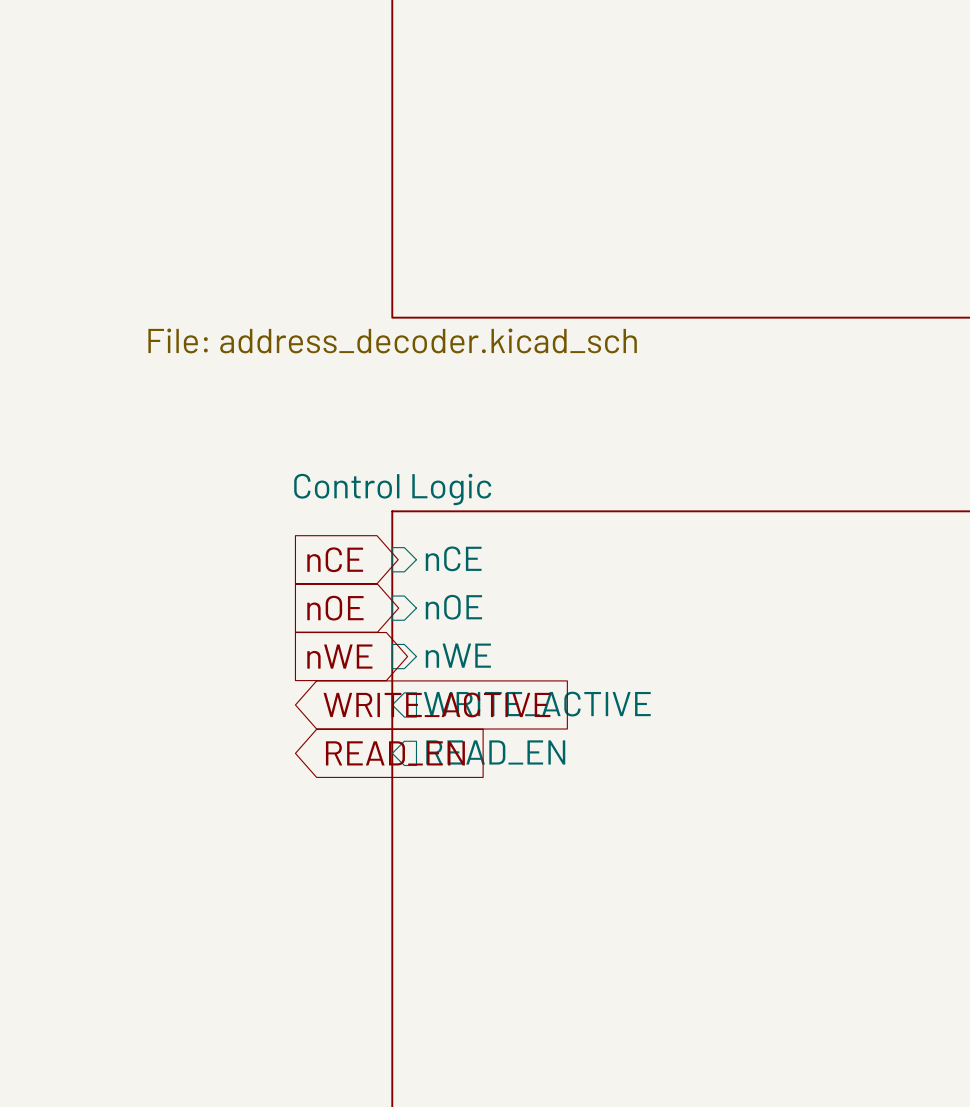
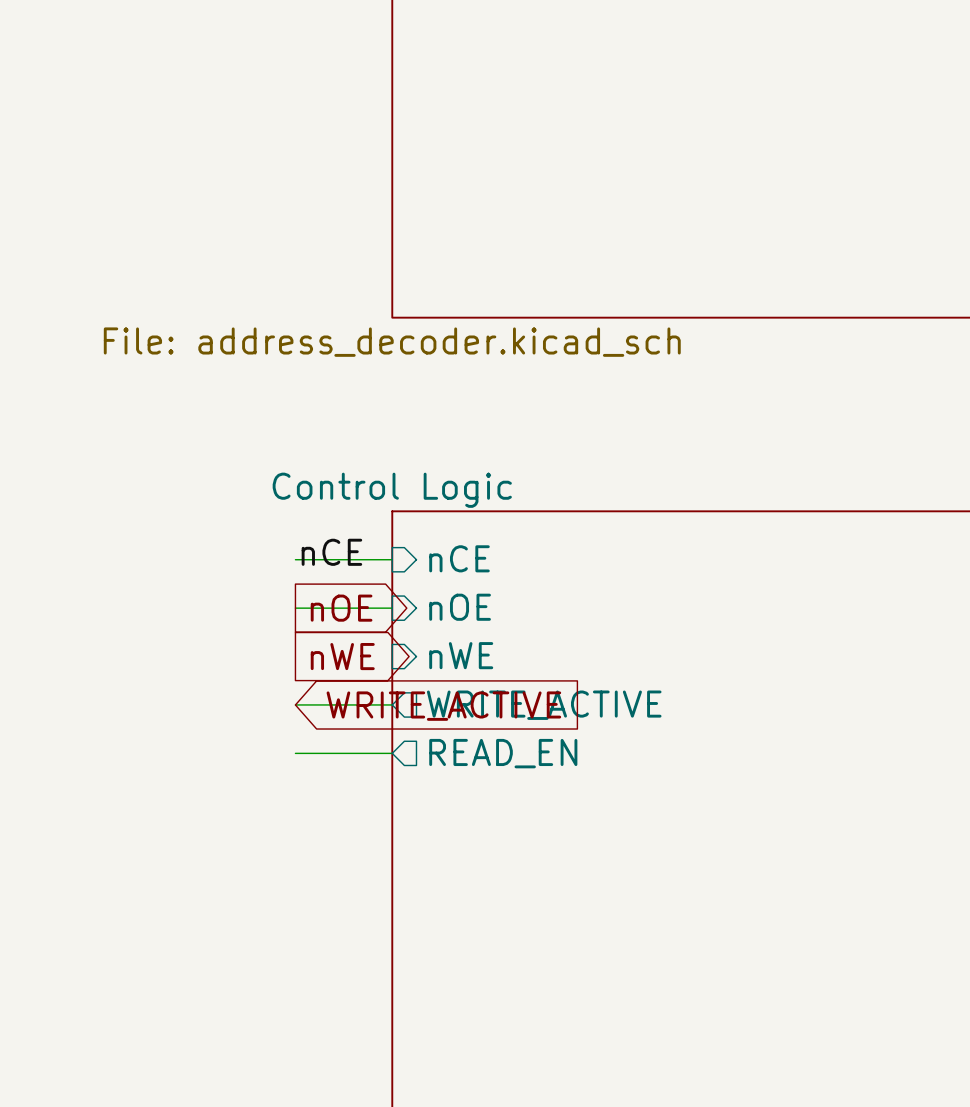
label: none -> nCE (331, 552)
wire: none -> (295, 559) (392, 559)
global label: nCE (335, 559) -> none
wire: none -> (295, 608) (392, 608)
wire: none -> (295, 704) (392, 704)
wire: none -> (295, 753) (392, 753)
global label: READ_EN (395, 753) -> none

